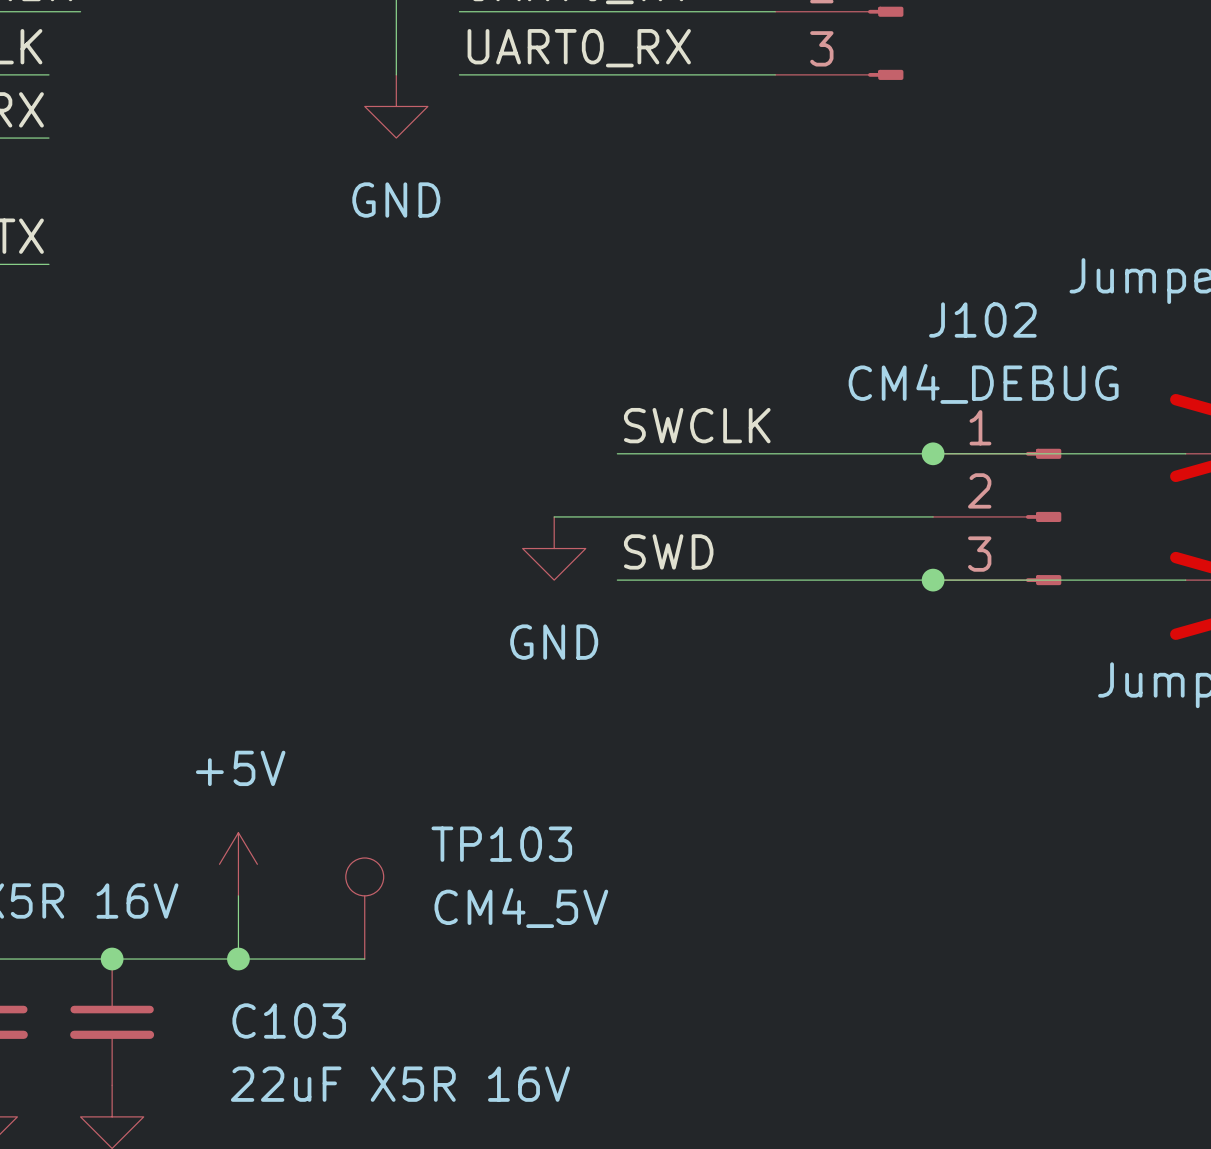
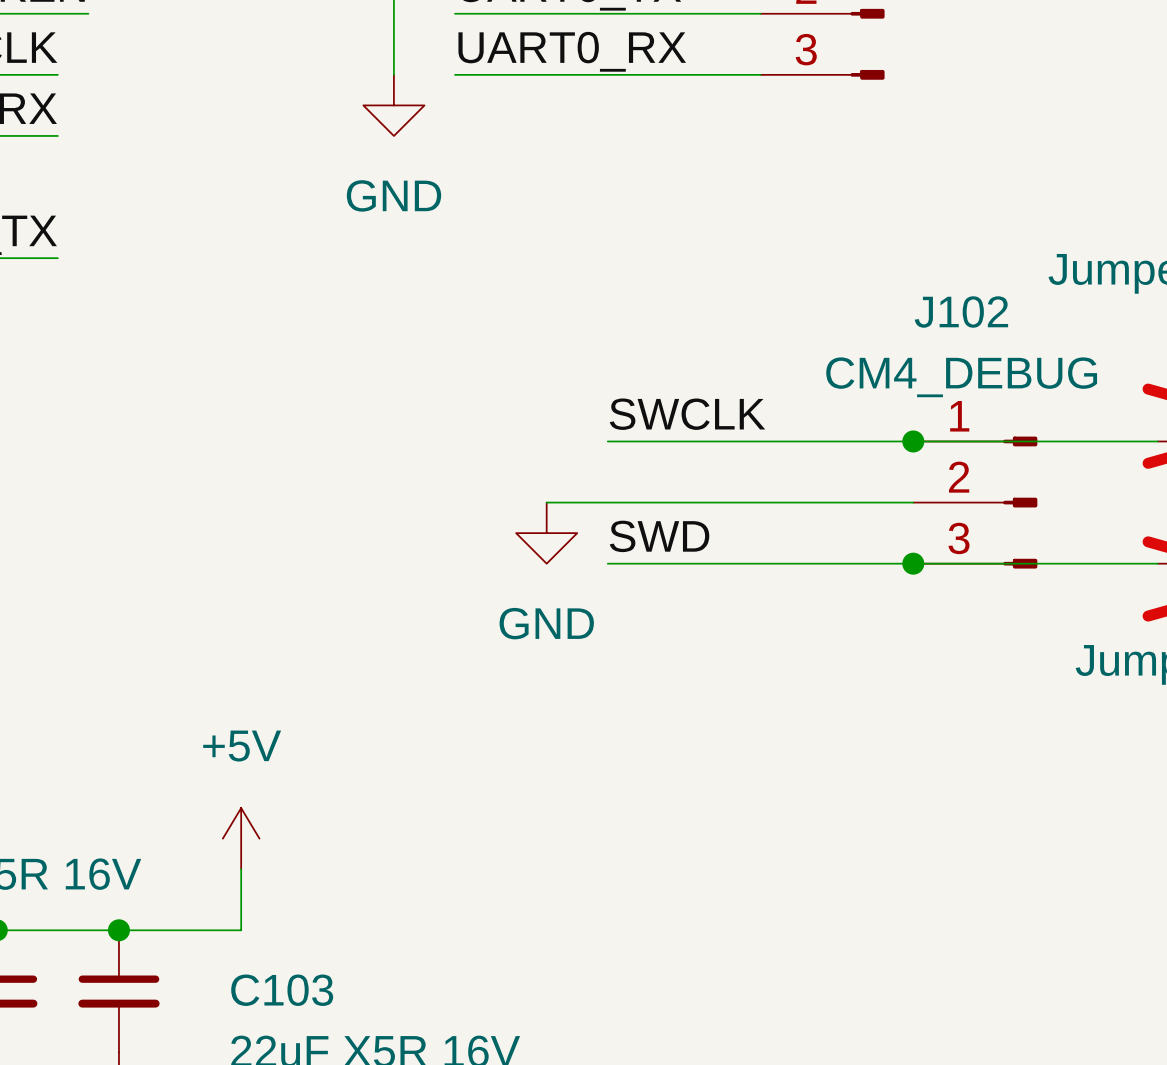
TP103: CM4_5V (364, 908) -> none
wire: (238, 959) (364, 959) -> none
junction: (238, 959) -> none

